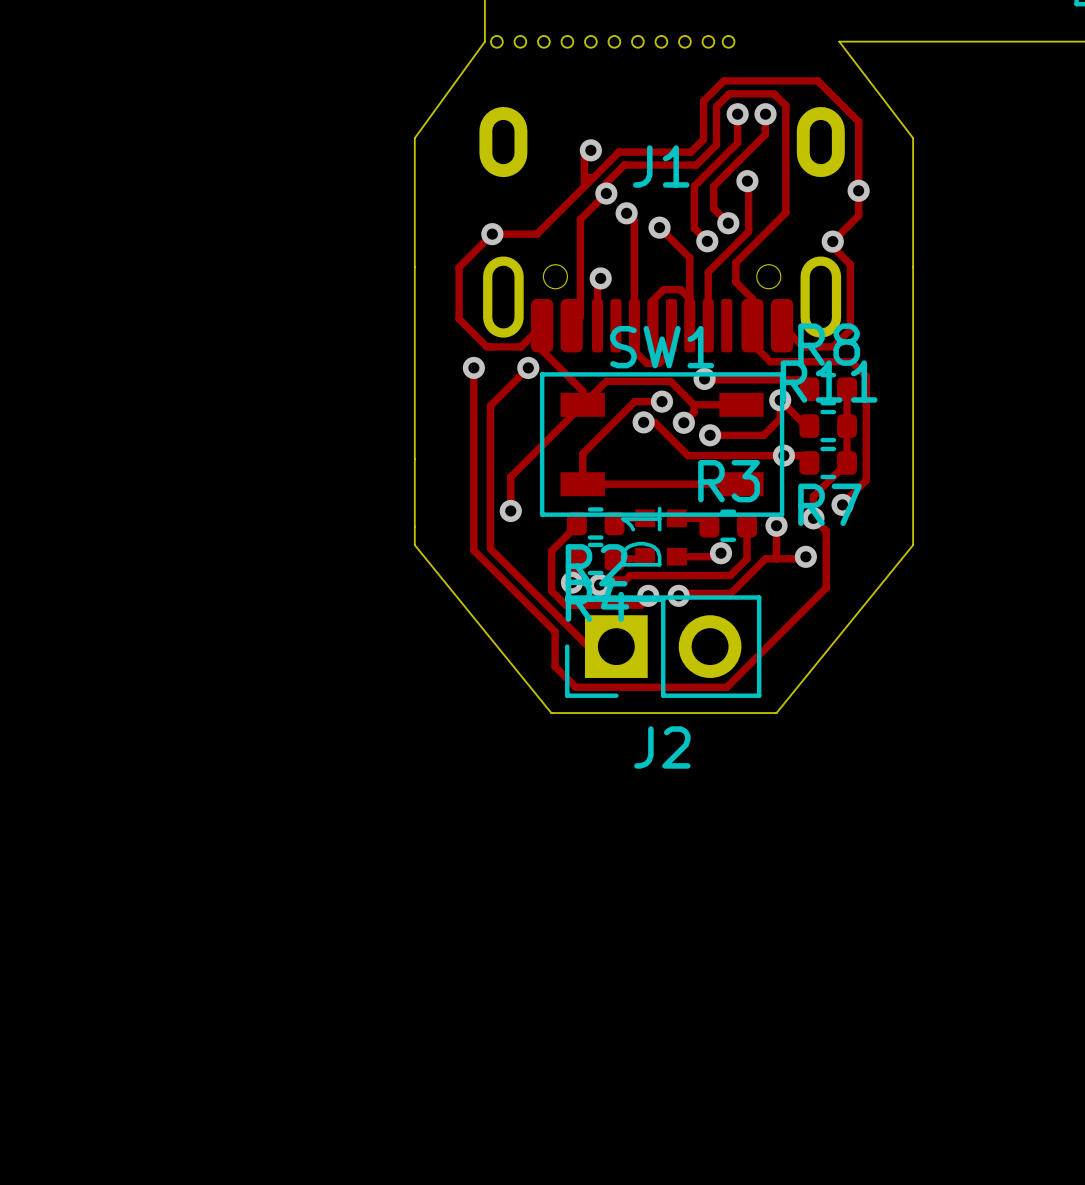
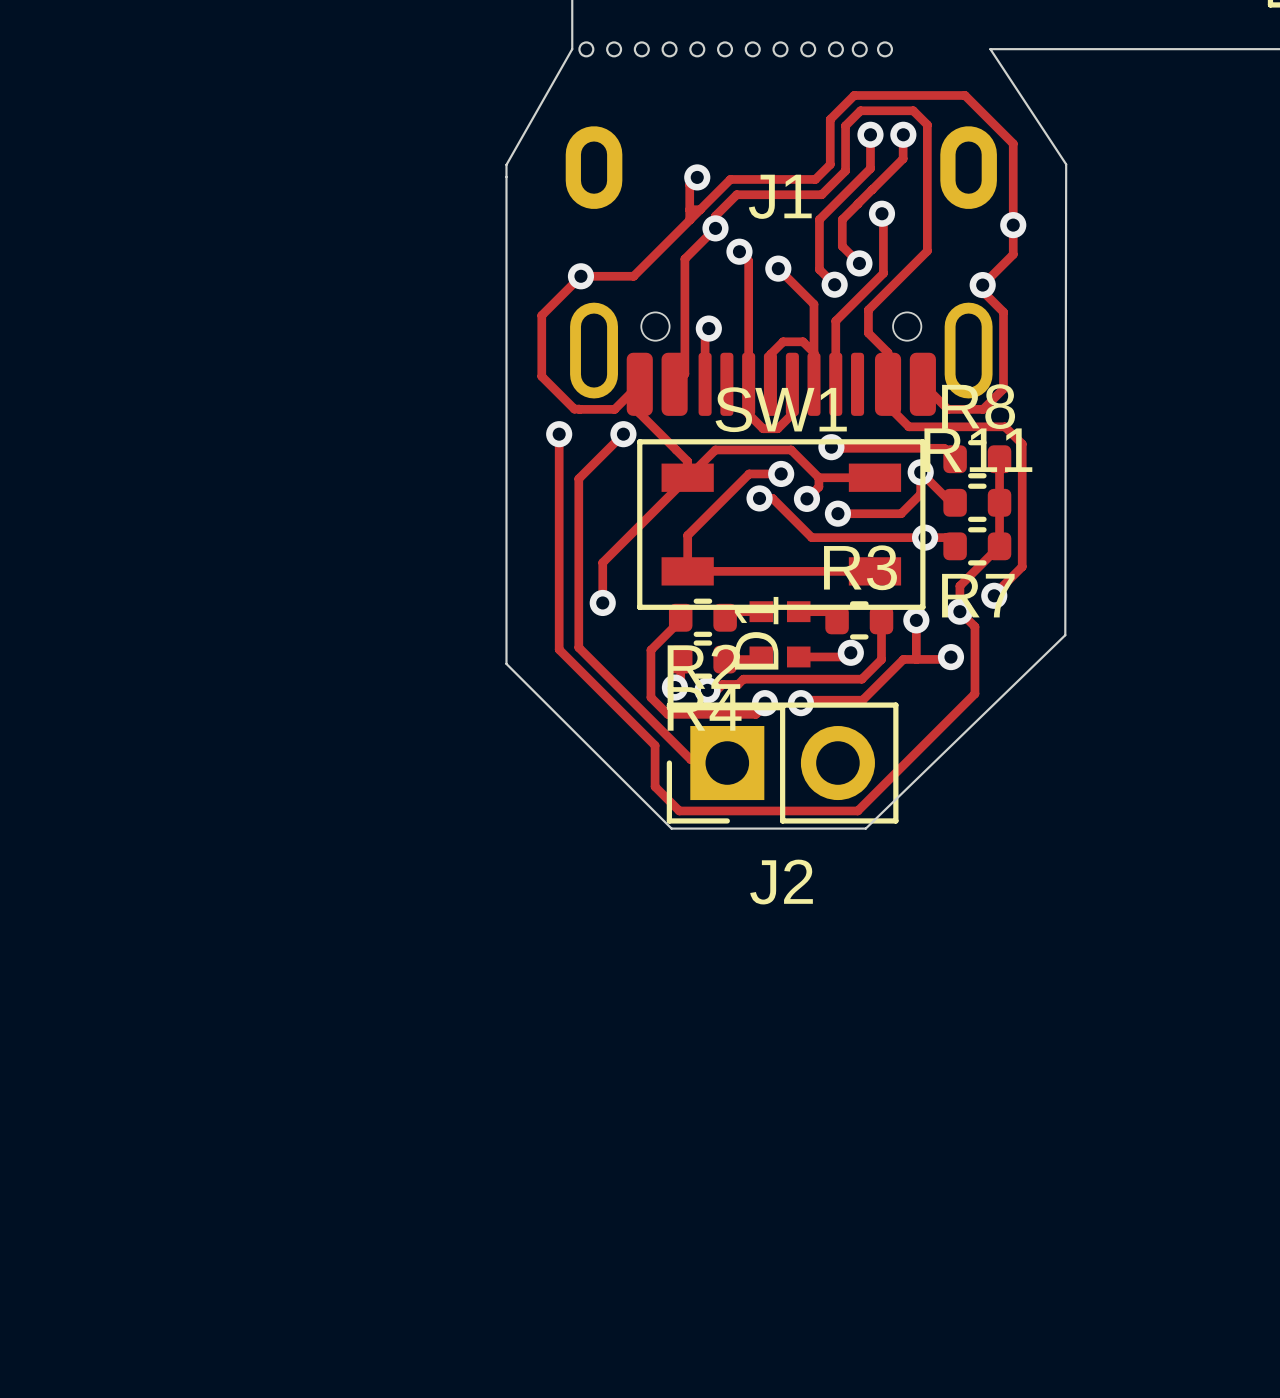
round board edge: none -> [876, 41, 894, 58]
board edge: (484, 41) (414, 138) (414, 545) (551, 713) (776, 713) (913, 545) (913, 138) (839, 41) -> (572, 49) (506, 164) (506, 663) (671, 828) (865, 828) (1065, 635) (1066, 164) (990, 49)

